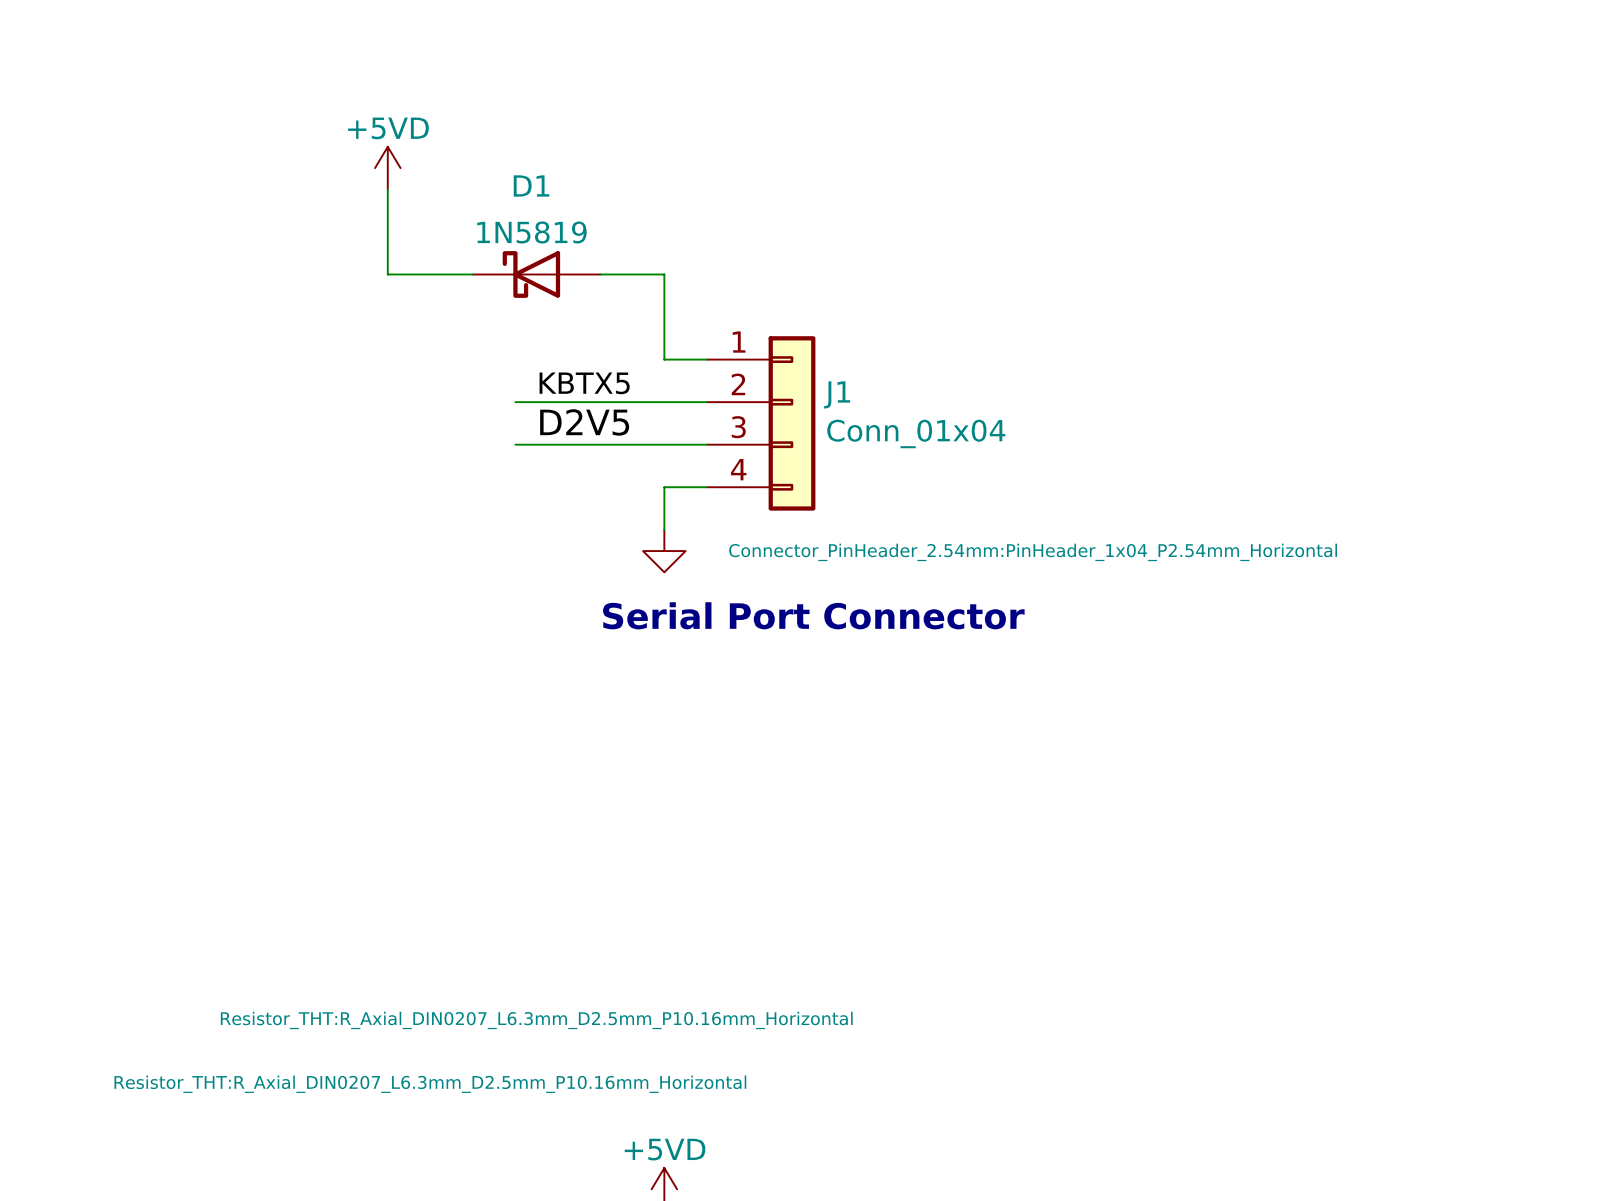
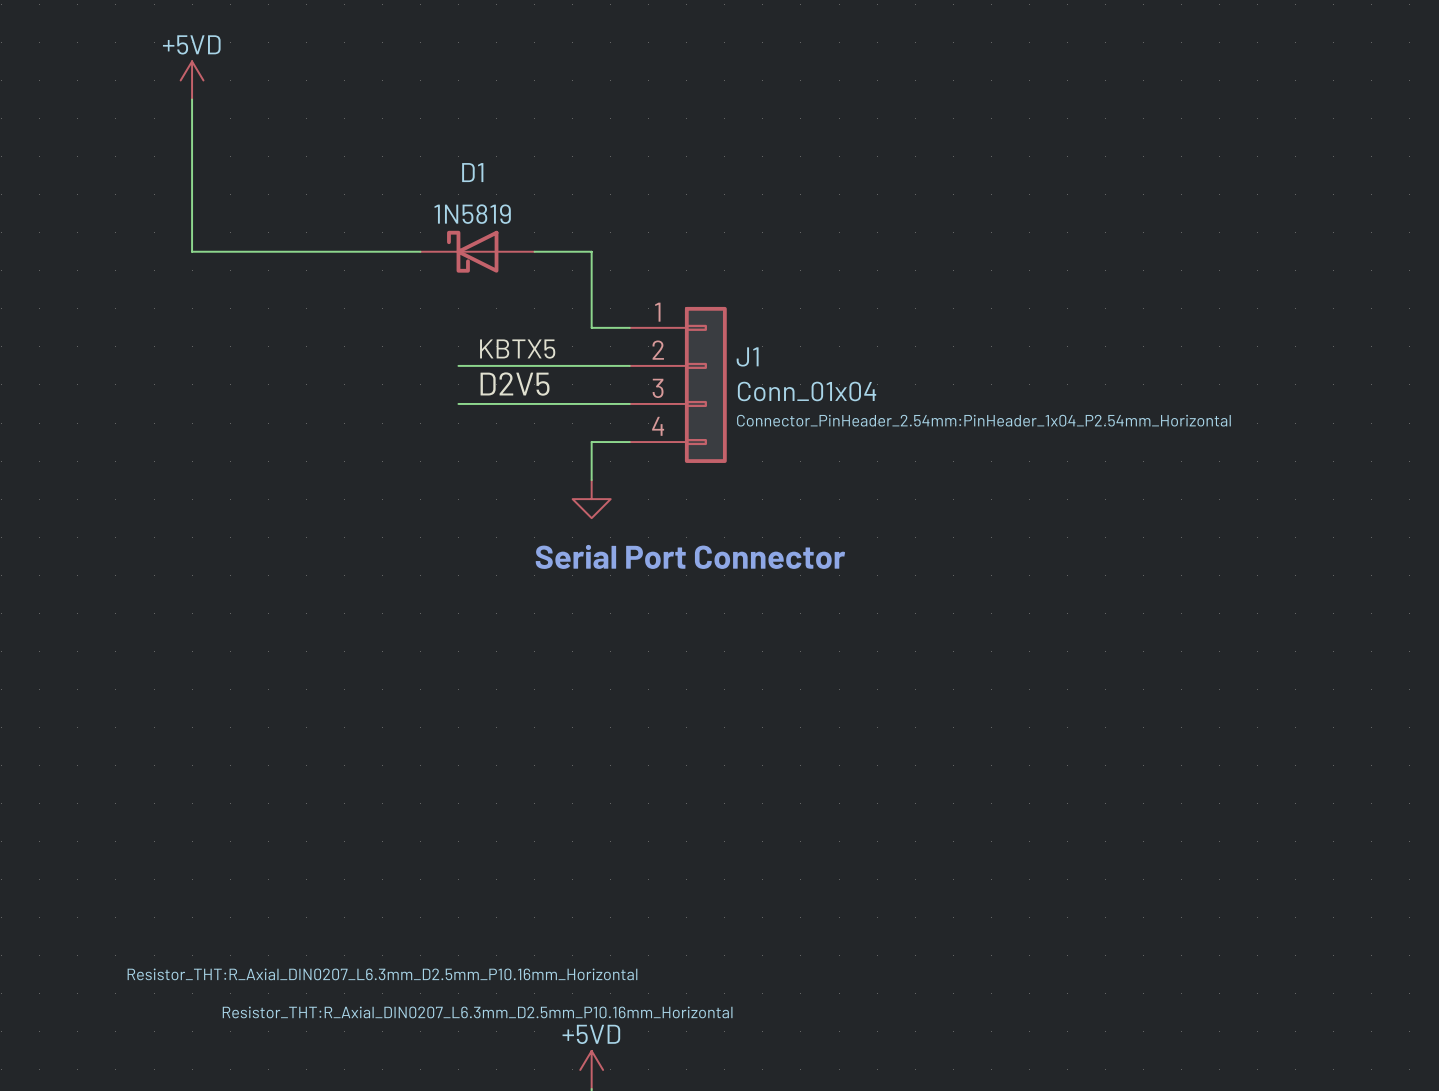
power symbol position: +5VD (387, 168) -> +5VD (192, 80)
wire: (387, 189) (387, 274) -> (192, 99) (192, 251) (344, 251)
J1 text position: Connector_PinHeader_2.54mm:PinHeader_1x04_P2.54mm_Horizontal (1033, 552) -> Connector_PinHeader_2.54mm:PinHeader_1x04_P2.54mm_Horizontal (983, 420)
part text position: Resistor_THT:R_Axial_DIN0207_L6.3mm_D2.5mm_P10.16mm_Horizontal (536, 1020) -> Resistor_THT:R_Axial_DIN0207_L6.3mm_D2.5mm_P10.16mm_Horizontal (477, 1012)

